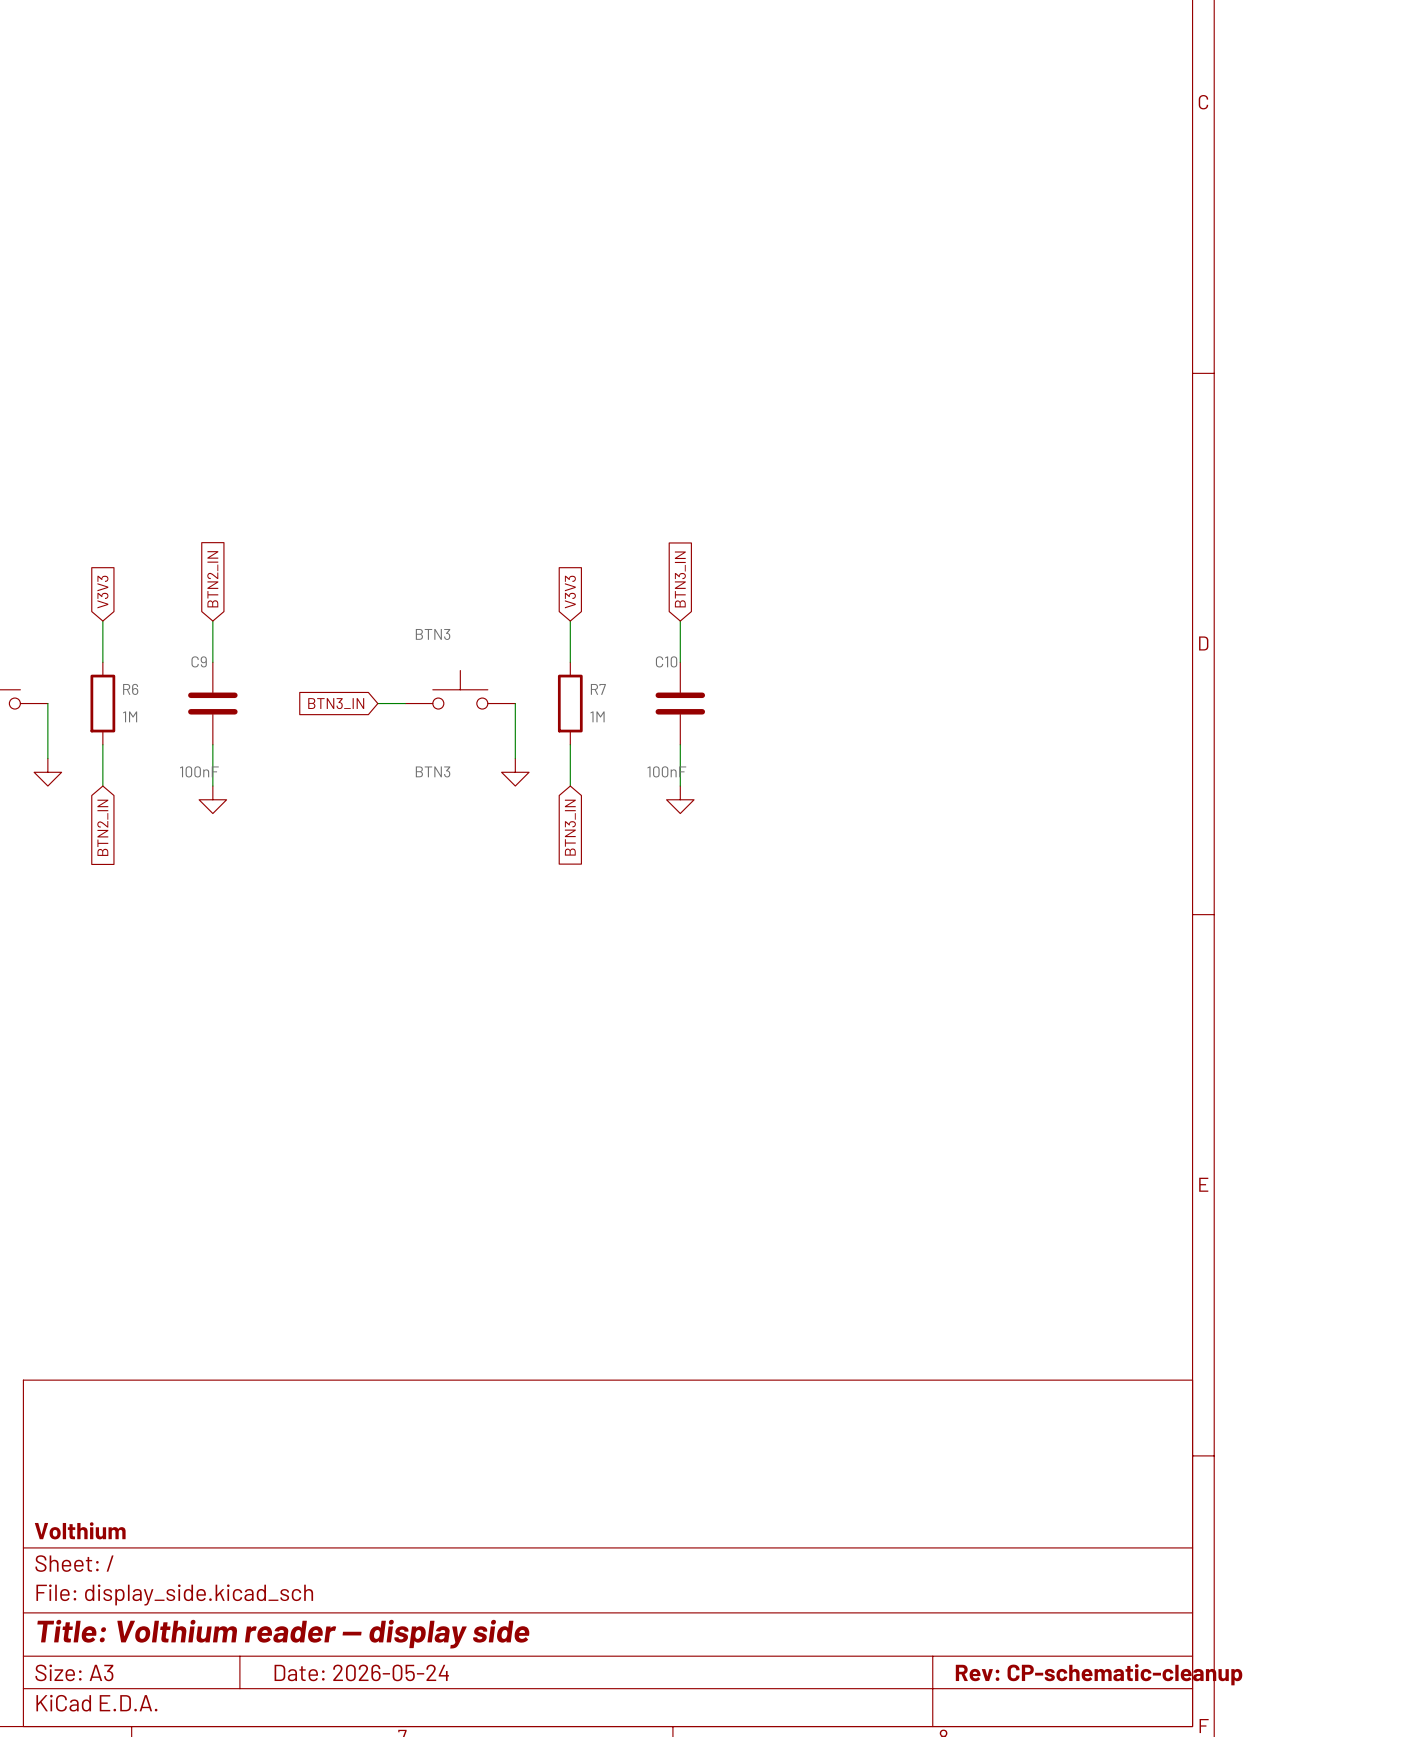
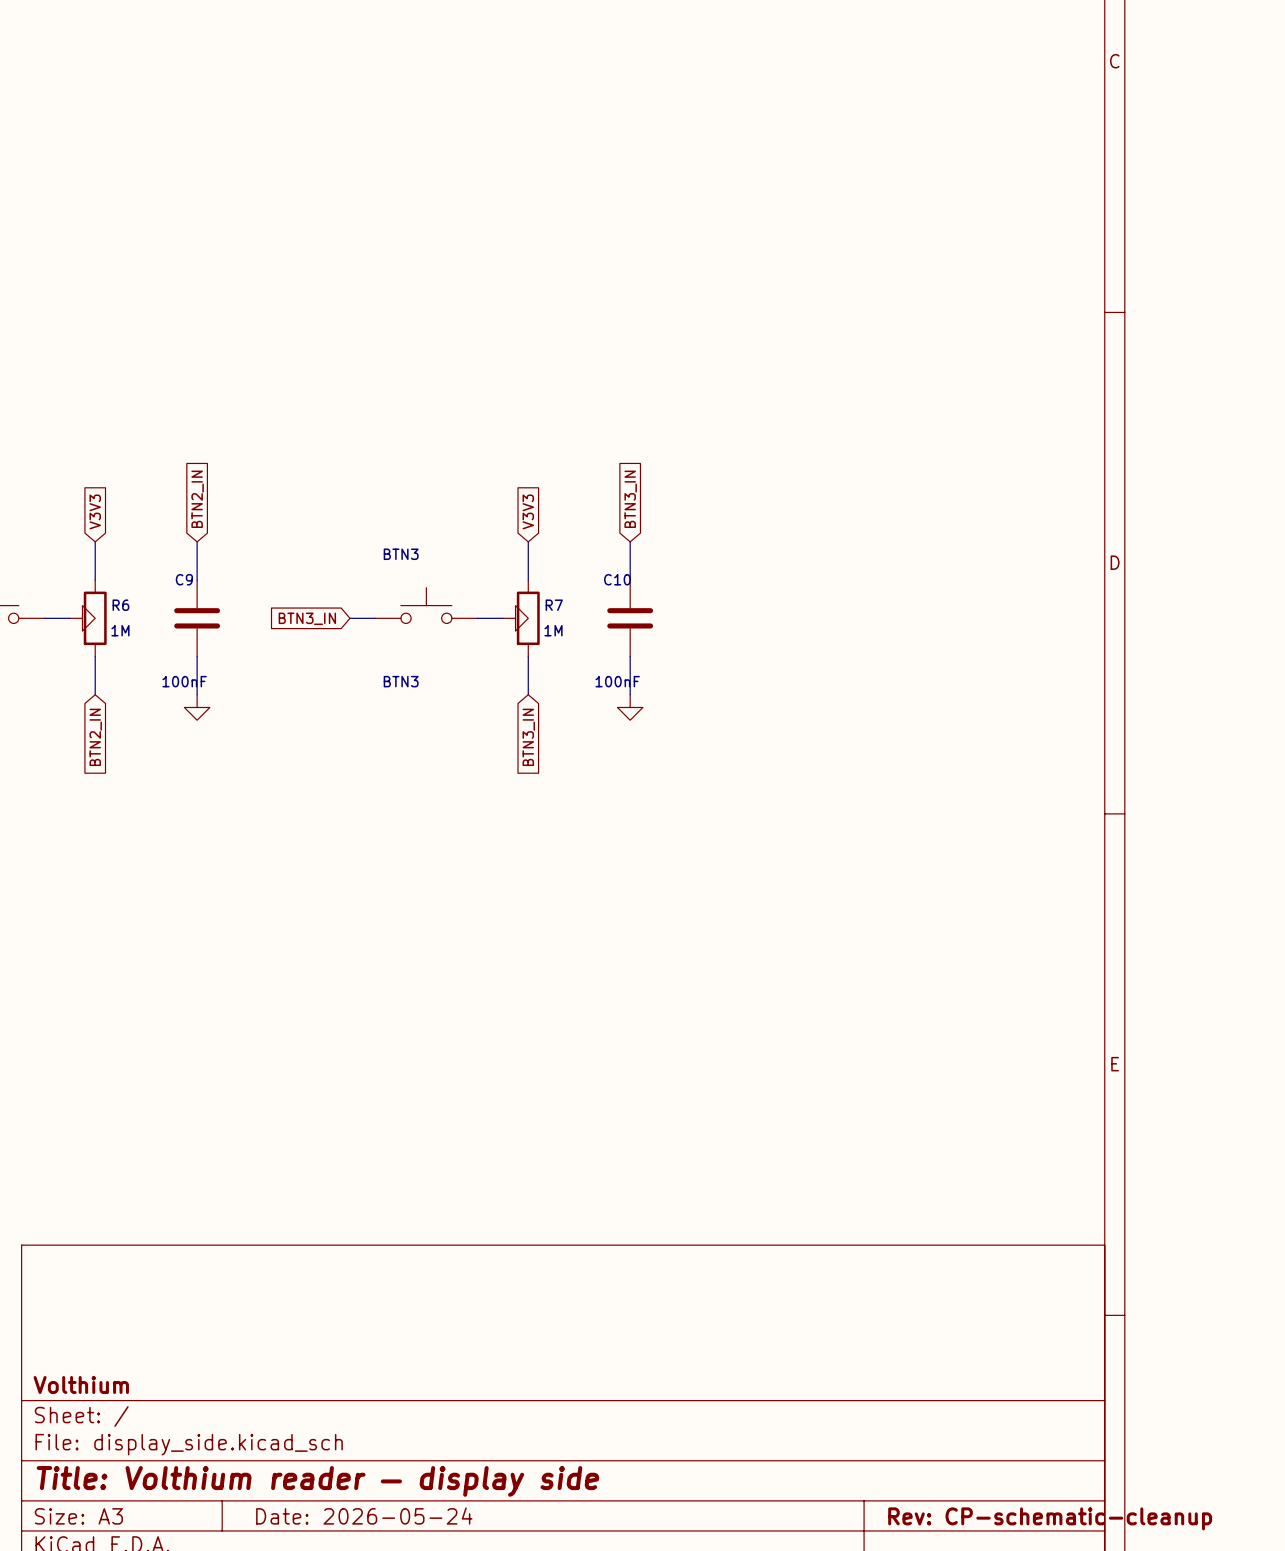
wire: (47, 703) (47, 758) -> (44, 618) (69, 618)
wire: (515, 703) (515, 758) -> (477, 618) (502, 618)
power symbol rotation: 0° (47, 772) -> 90° counterclockwise (82, 618)
power symbol position: (47, 772) -> (82, 618)
power symbol rotation: 0° (515, 772) -> 90° counterclockwise (515, 618)
power symbol position: (515, 772) -> (515, 618)

